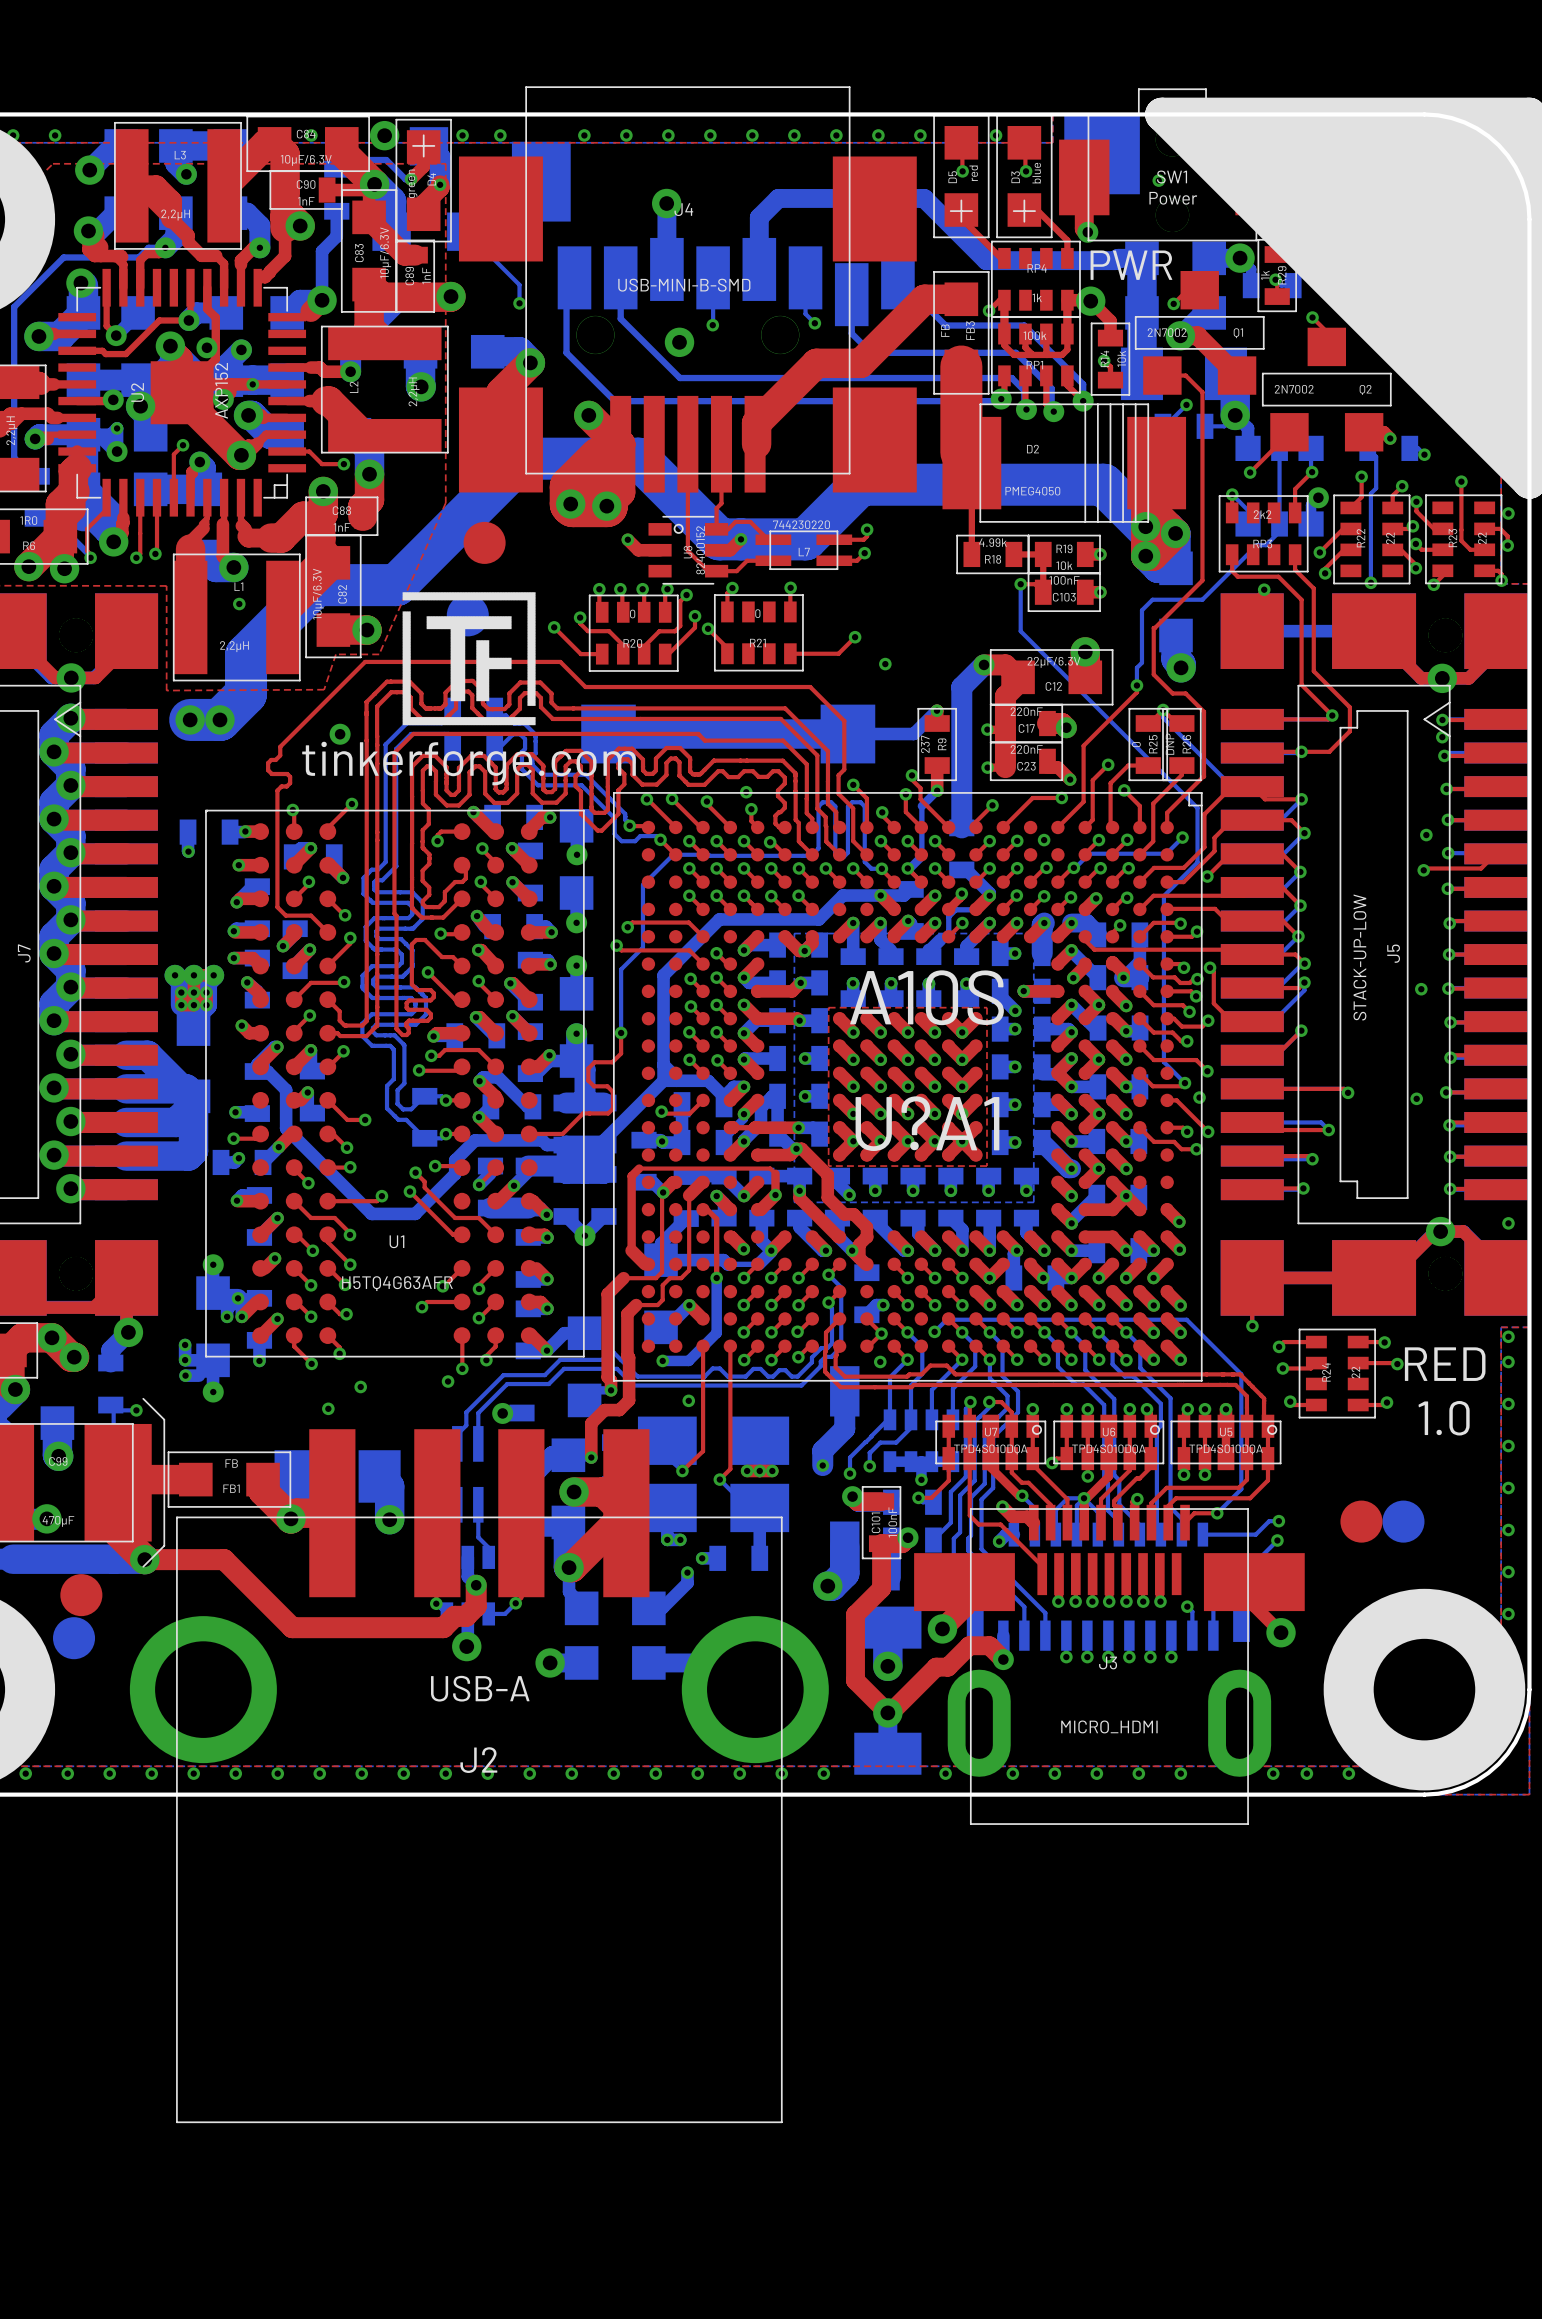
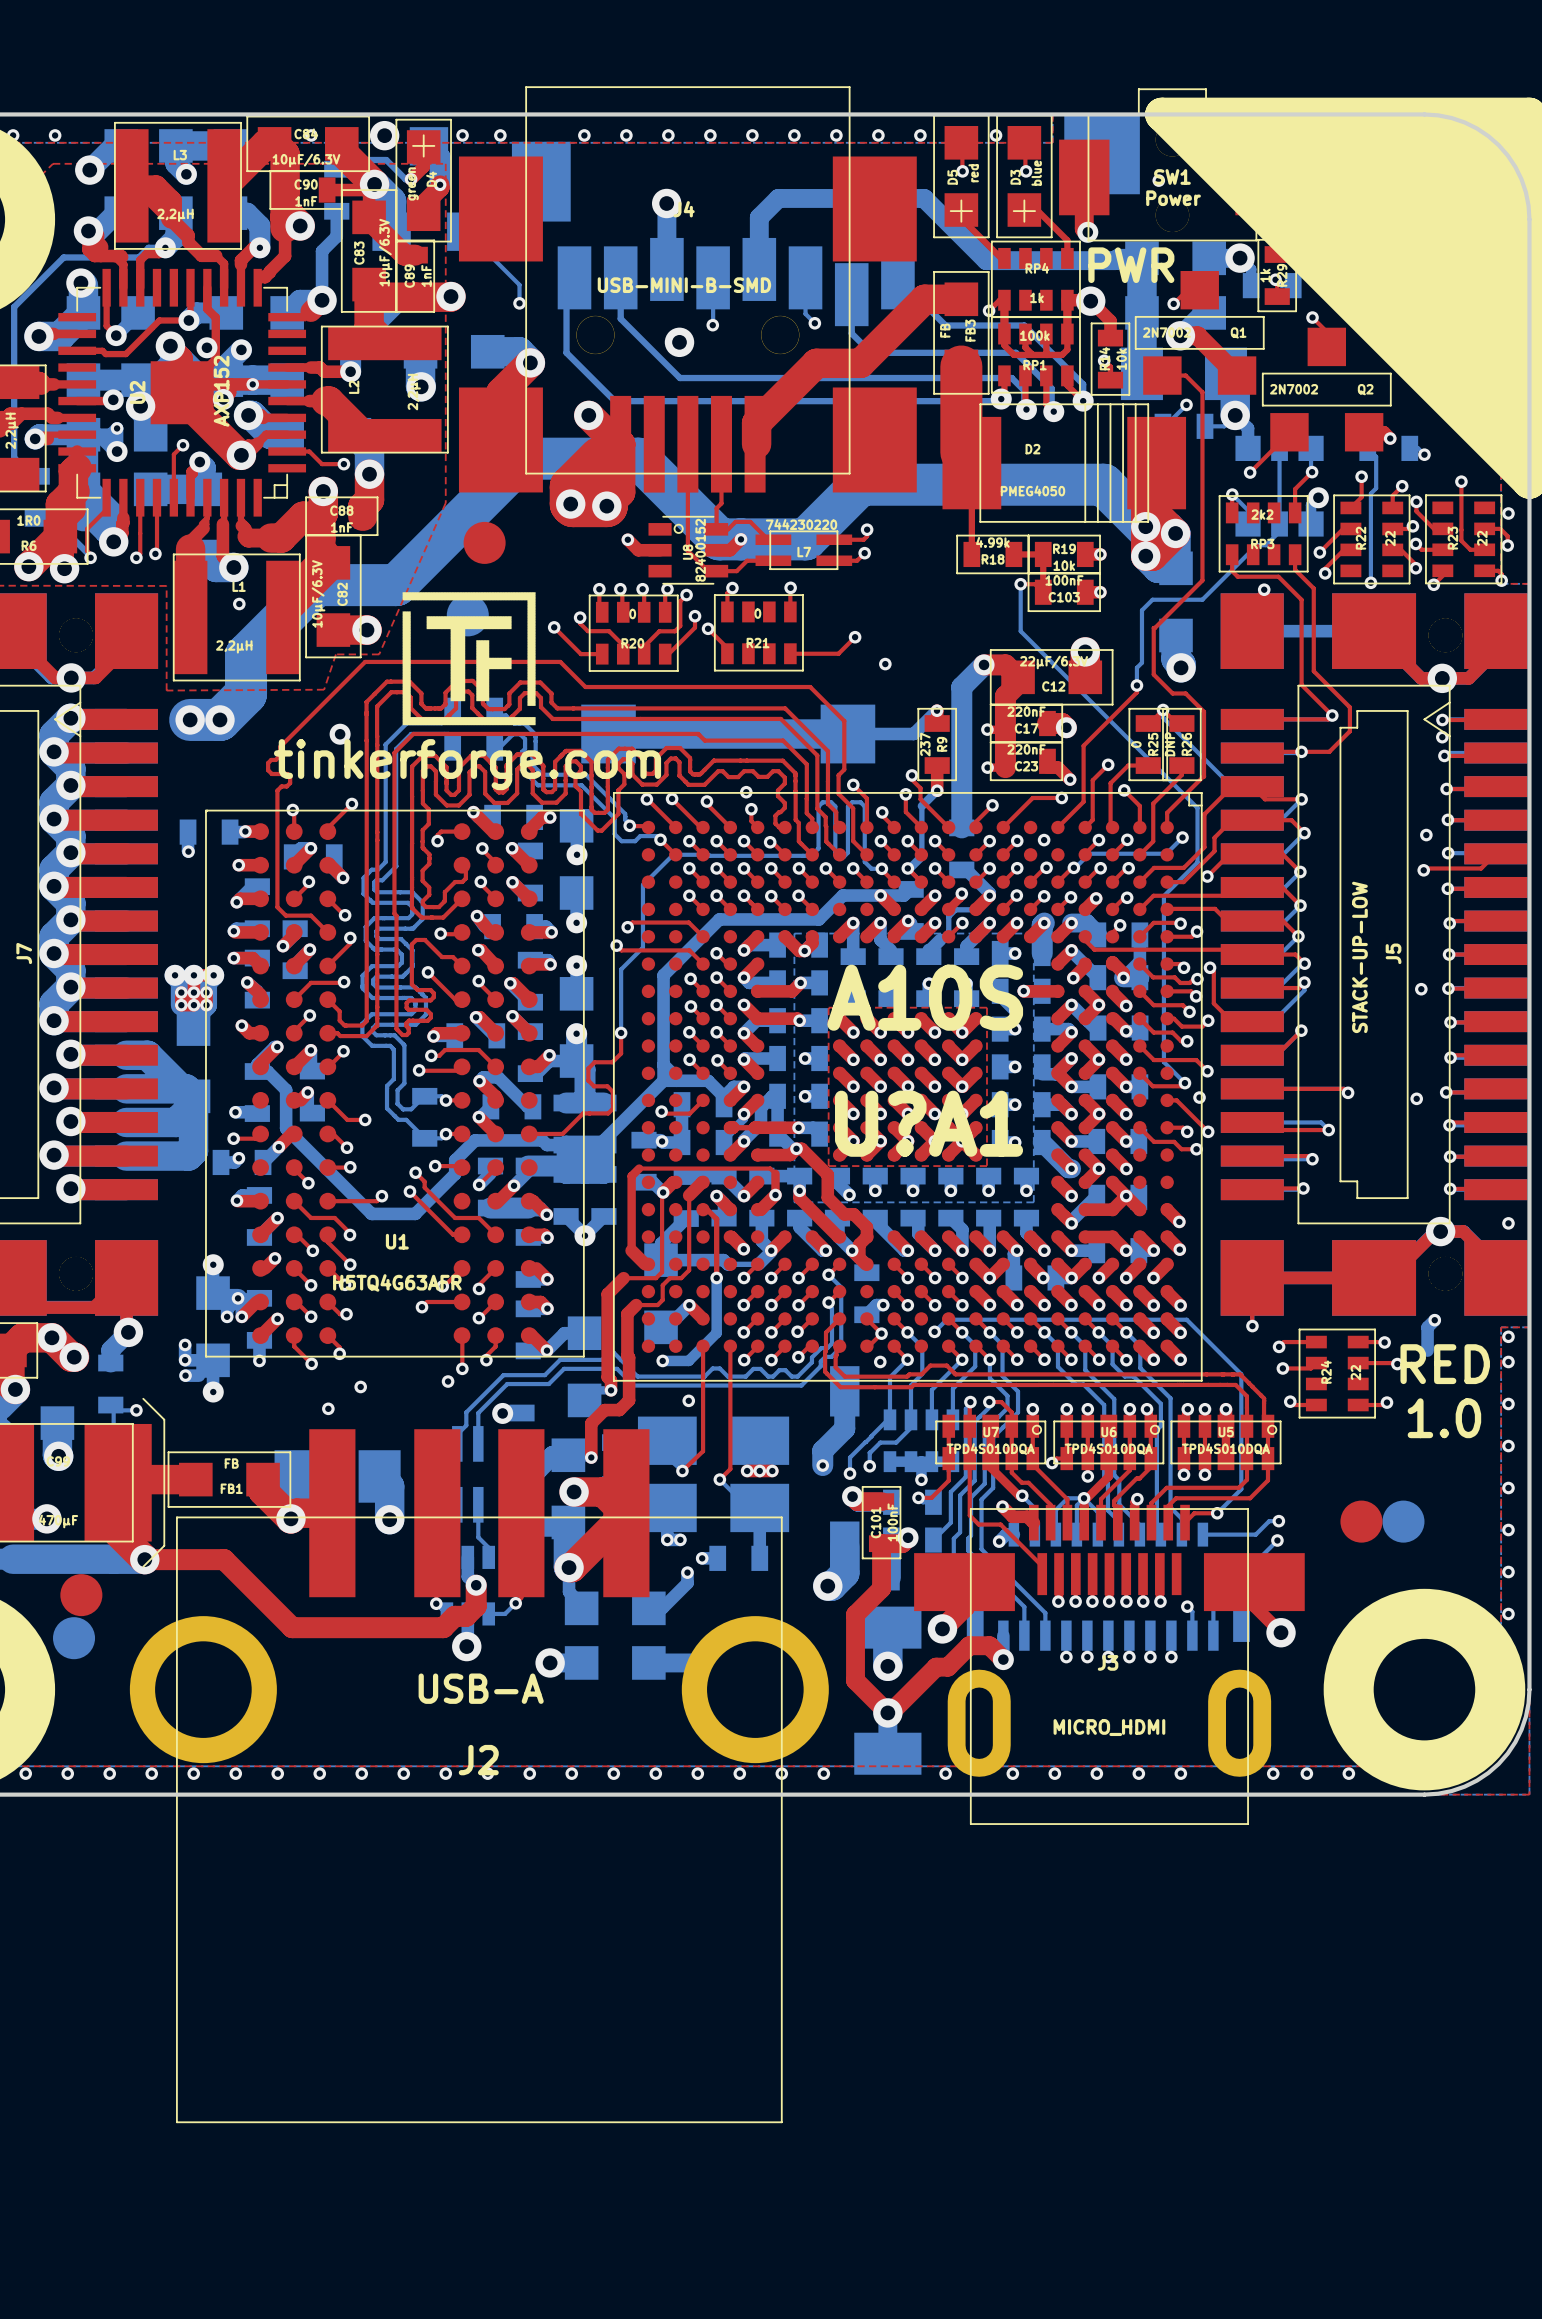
bottom track: none -> (1434, 1320) (1427, 1327) (1427, 1350)
via: none -> (1434, 1320)

